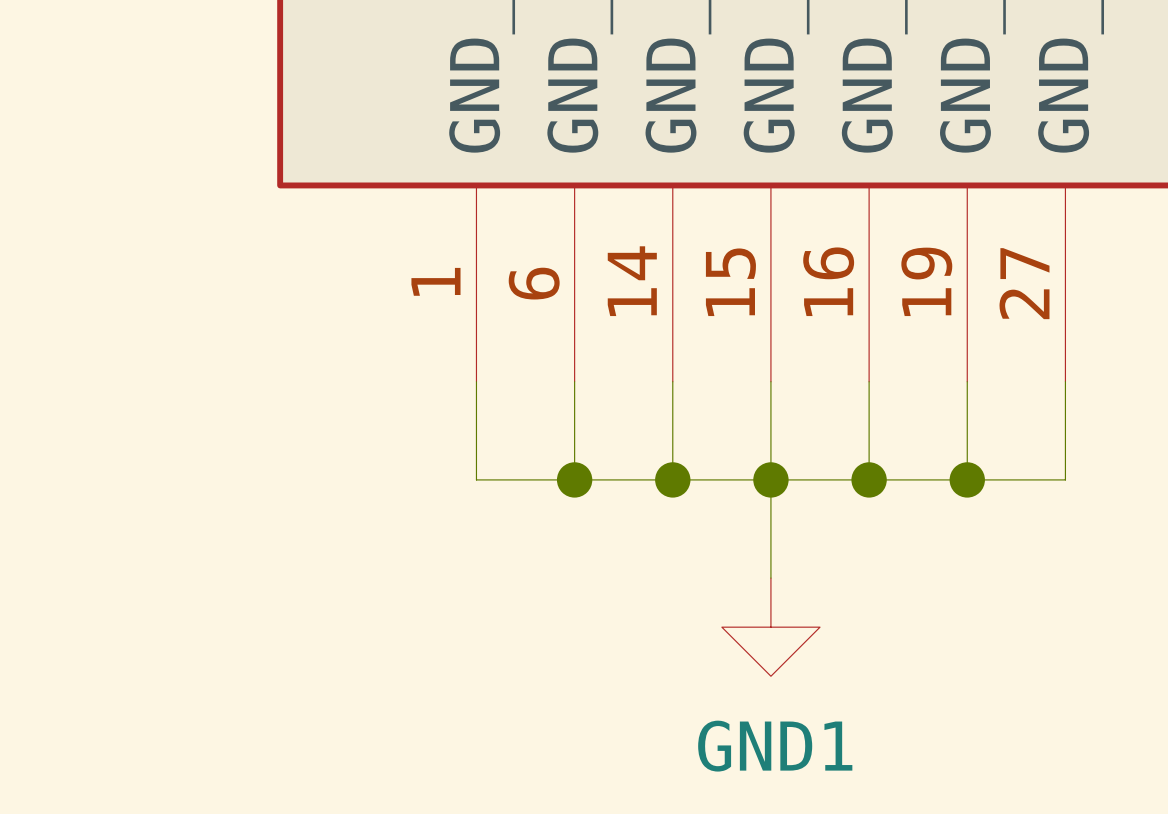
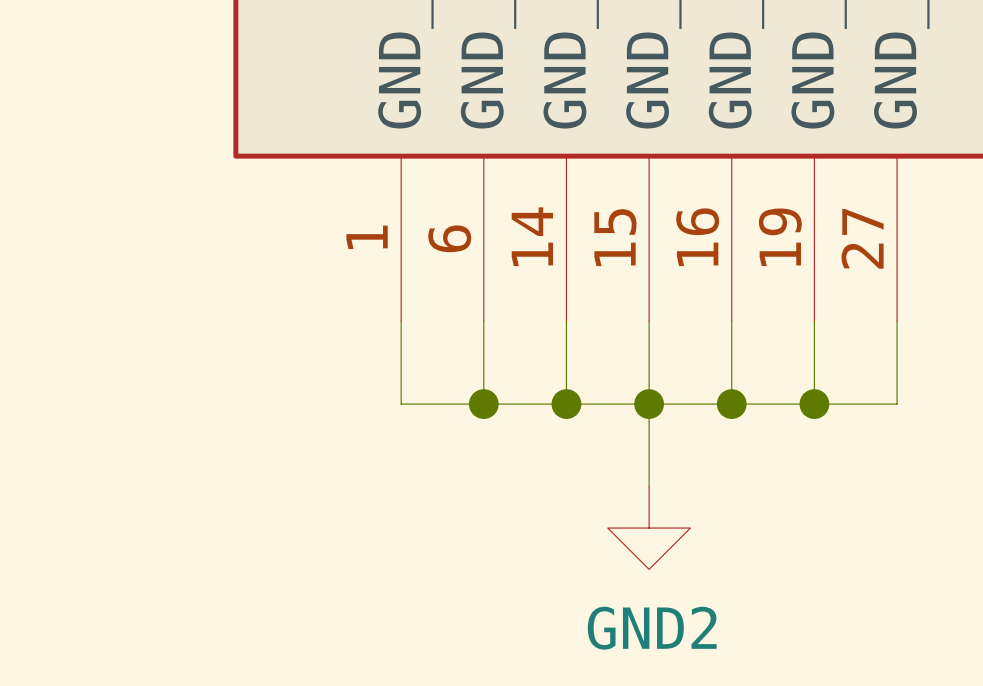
power symbol: GND1 (770, 627) -> GND2 (649, 528)

